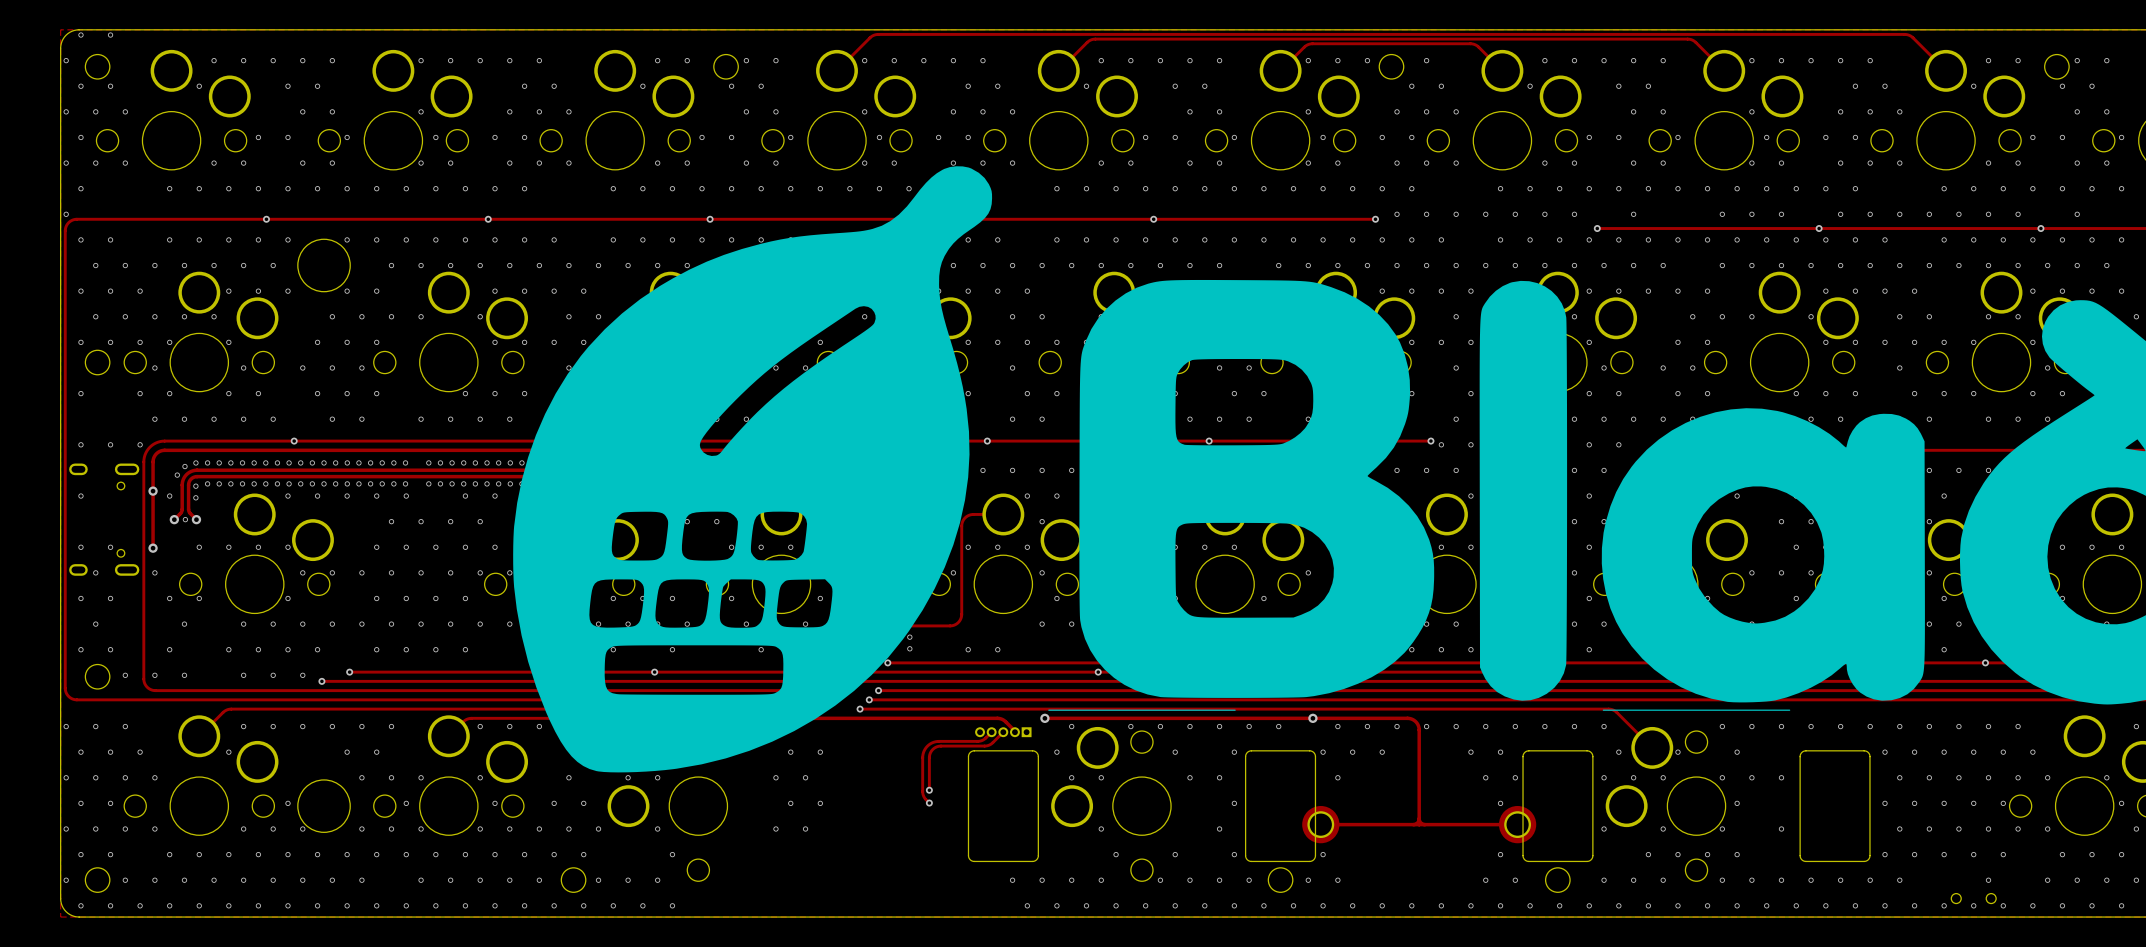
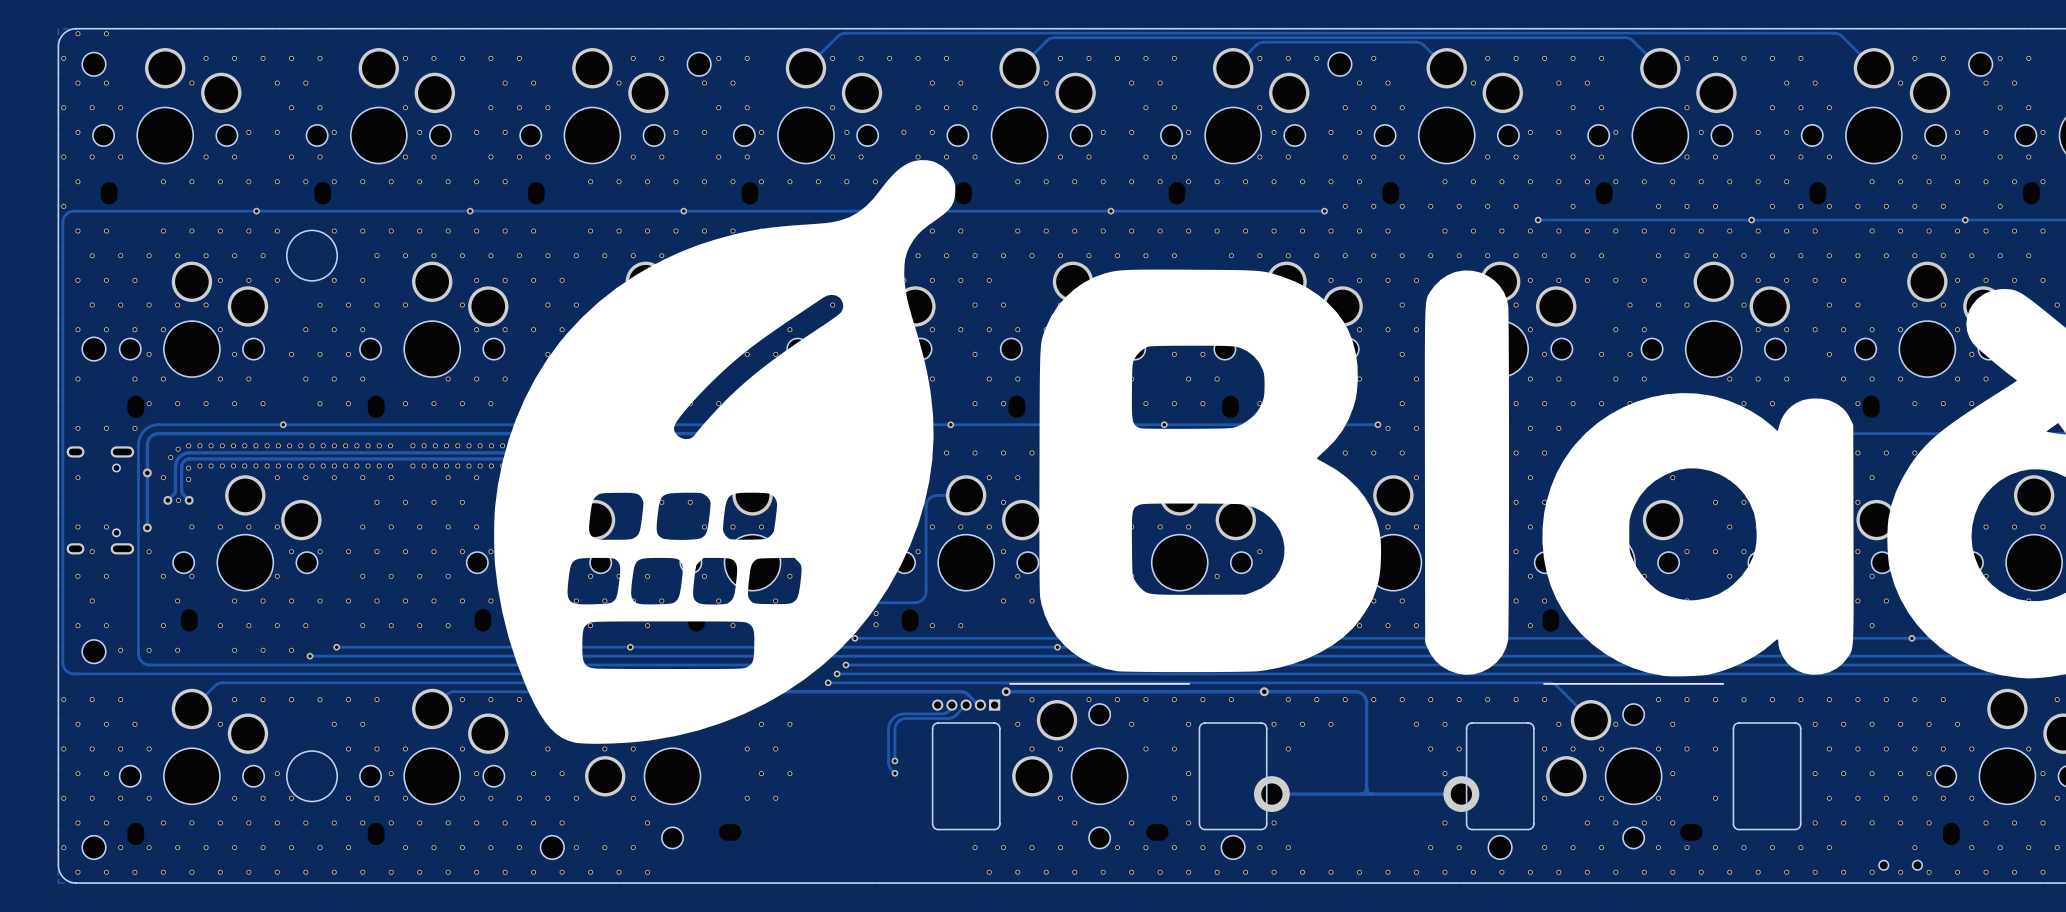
part footprint: [975, 727, 1032, 738] -> [932, 699, 1001, 711]

